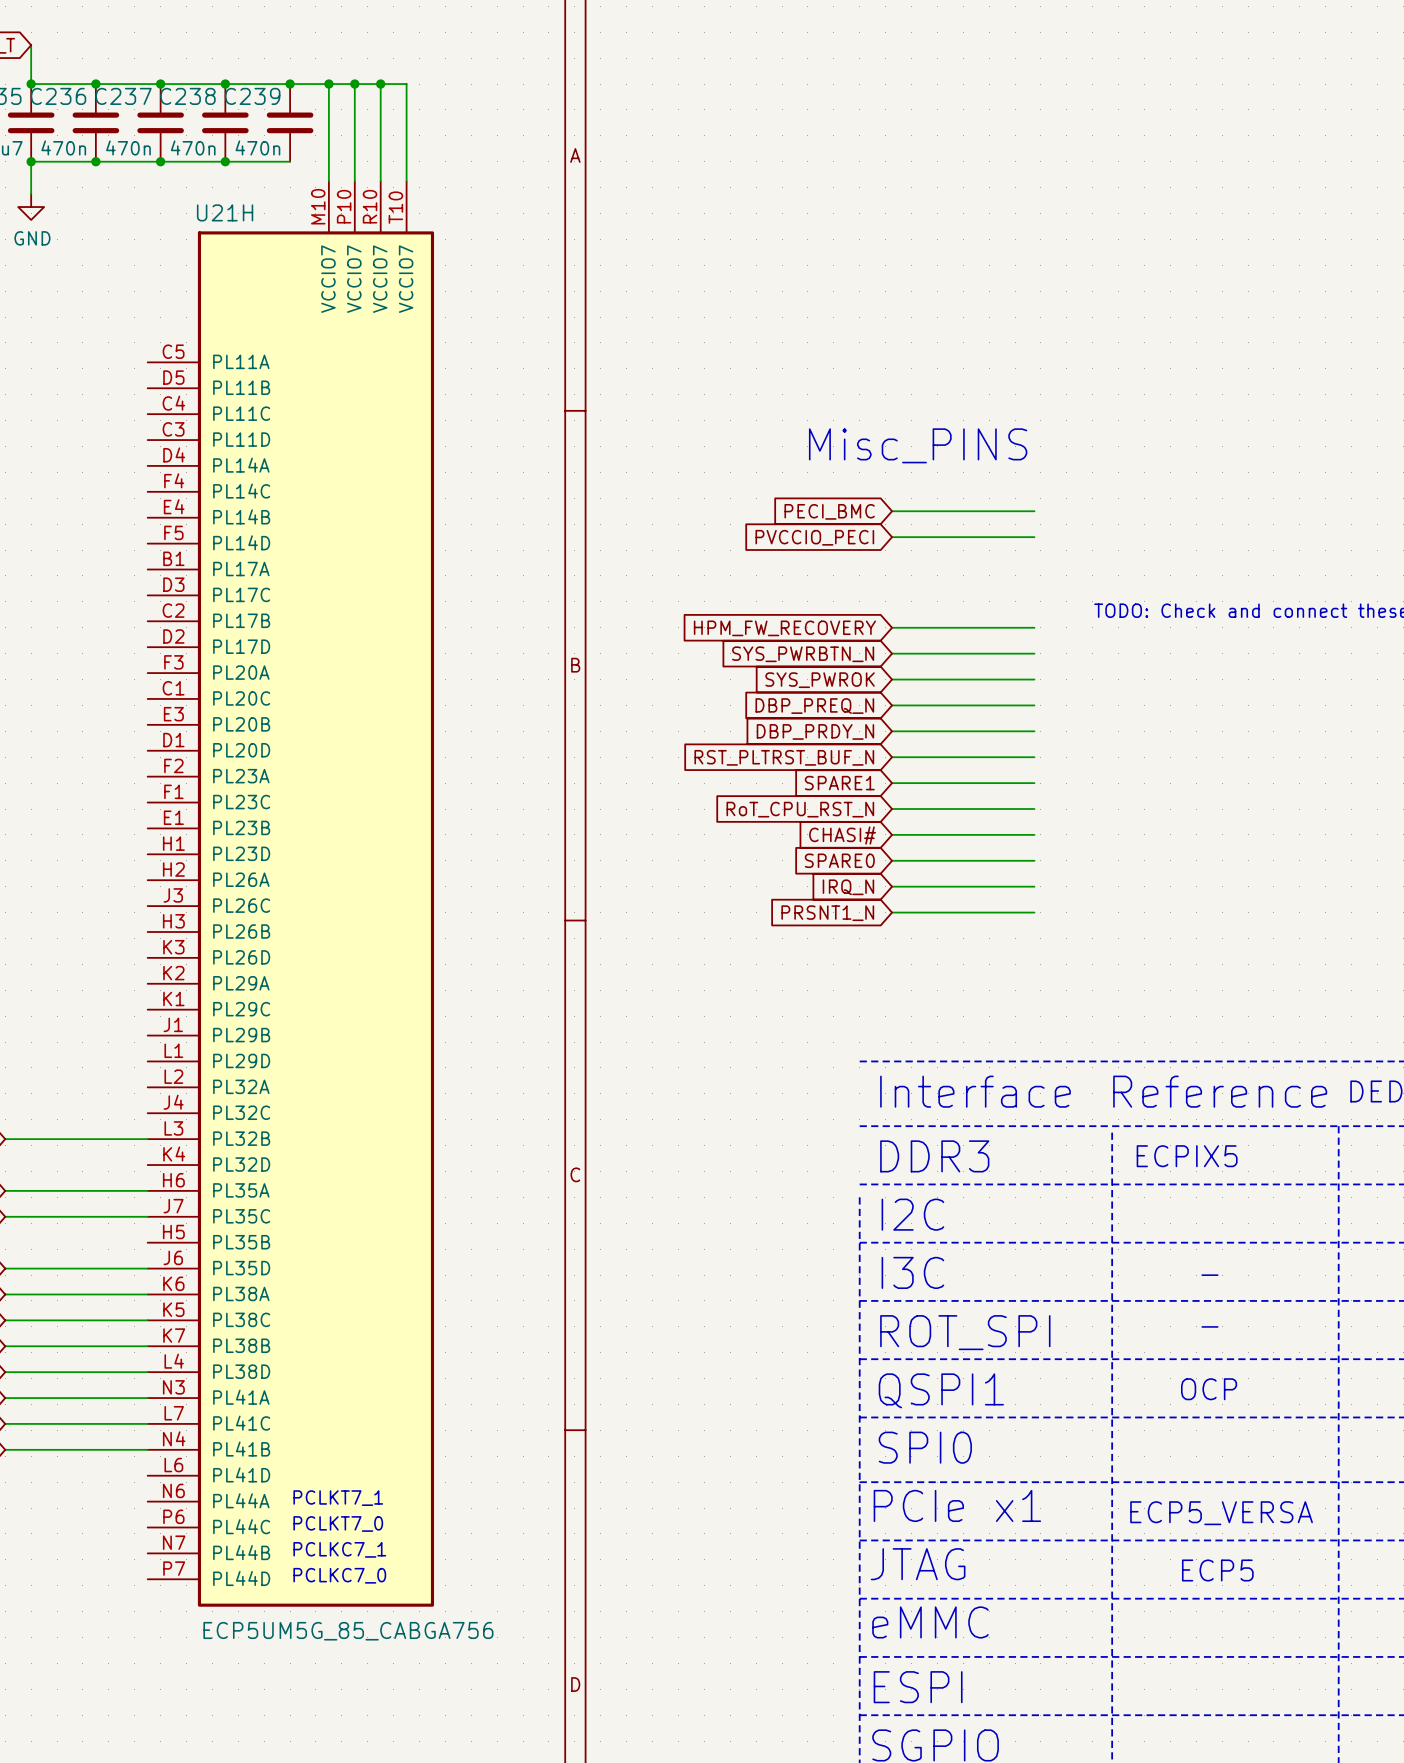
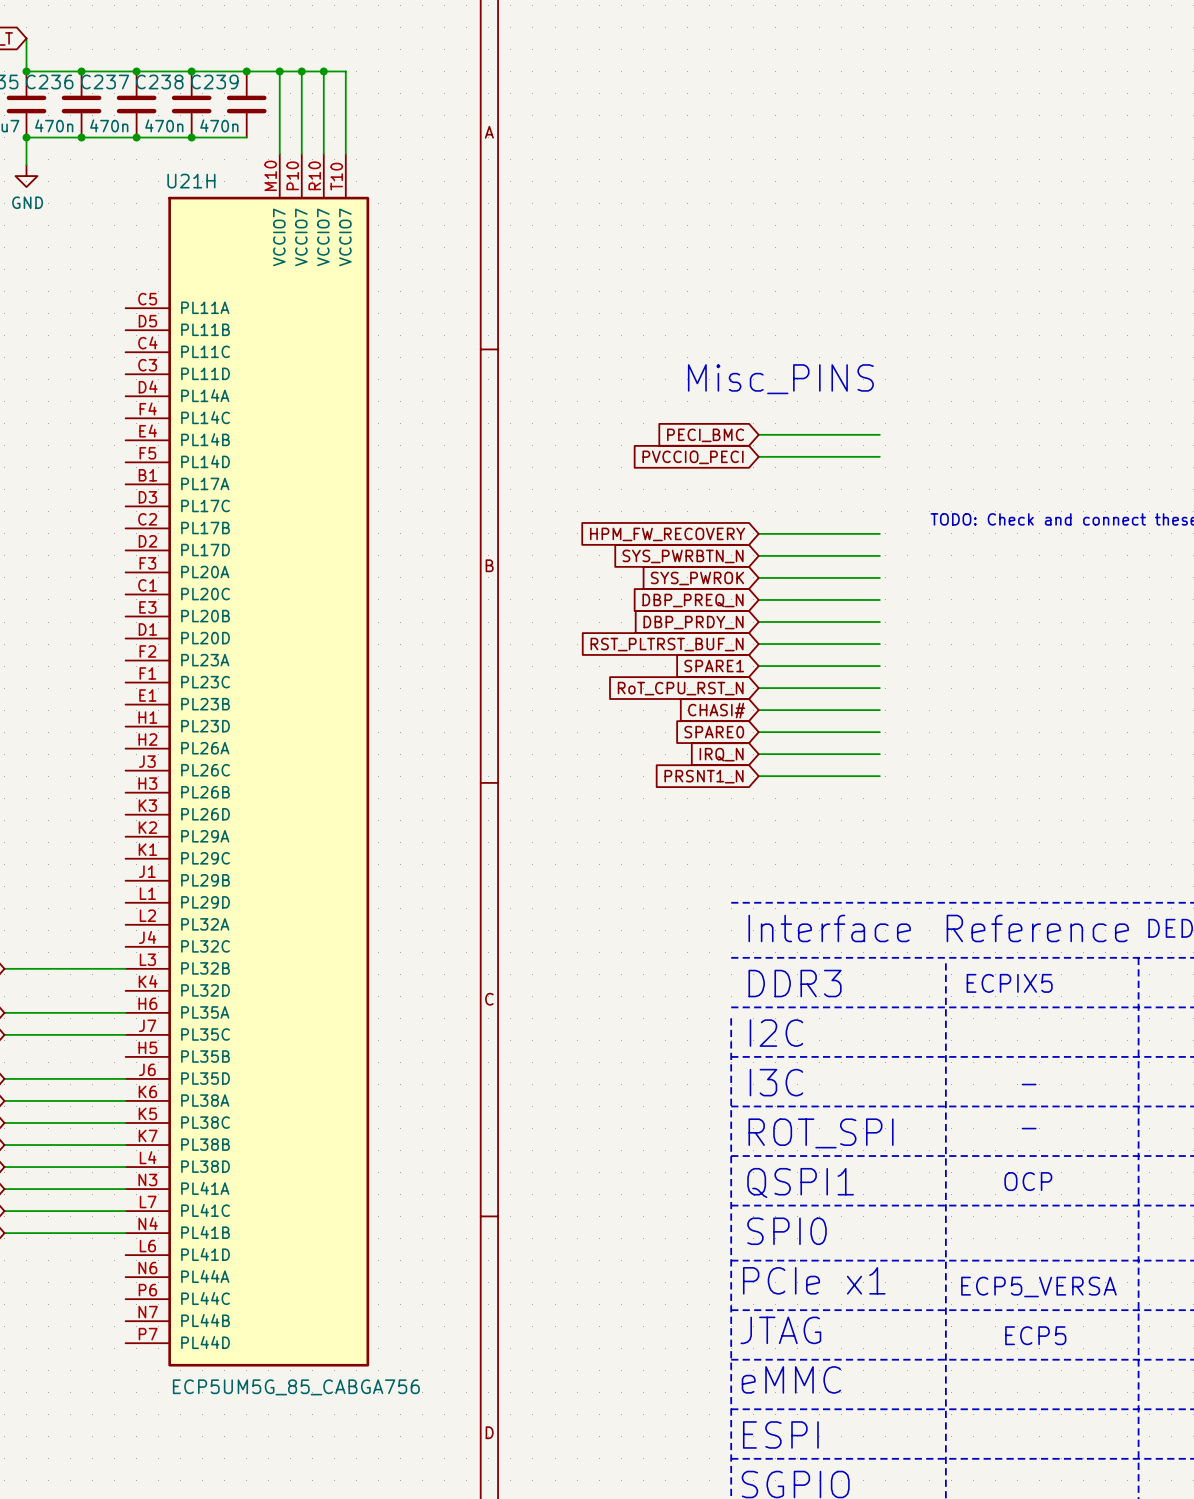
text: PCLKT7_1 (338, 1498) -> none
text: PCLKT7_0 (338, 1523) -> none
text: PCLKC7_1 (339, 1549) -> none
text: PCLKC7_0 (339, 1575) -> none

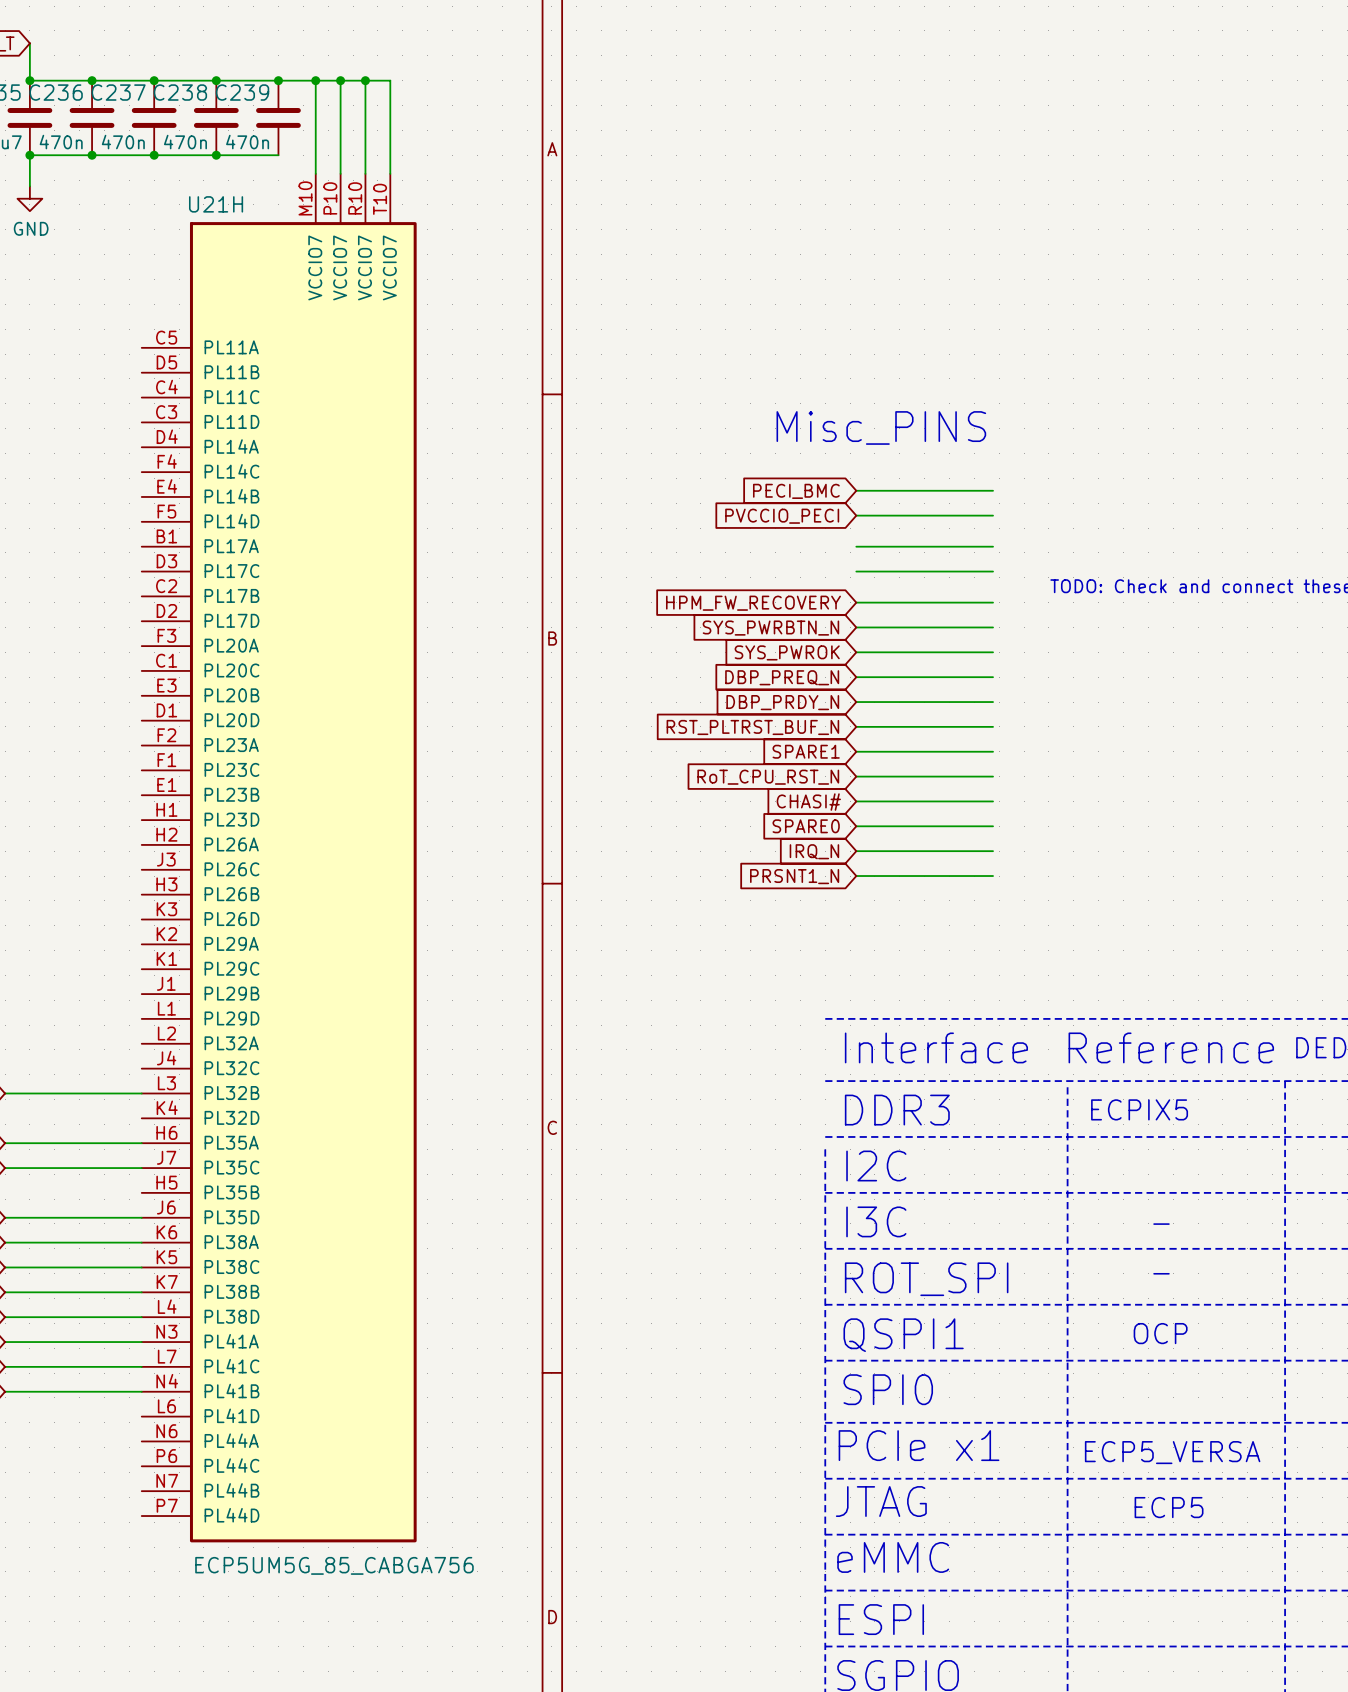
wire: none -> (856, 546) (993, 546)
wire: none -> (856, 571) (993, 571)

